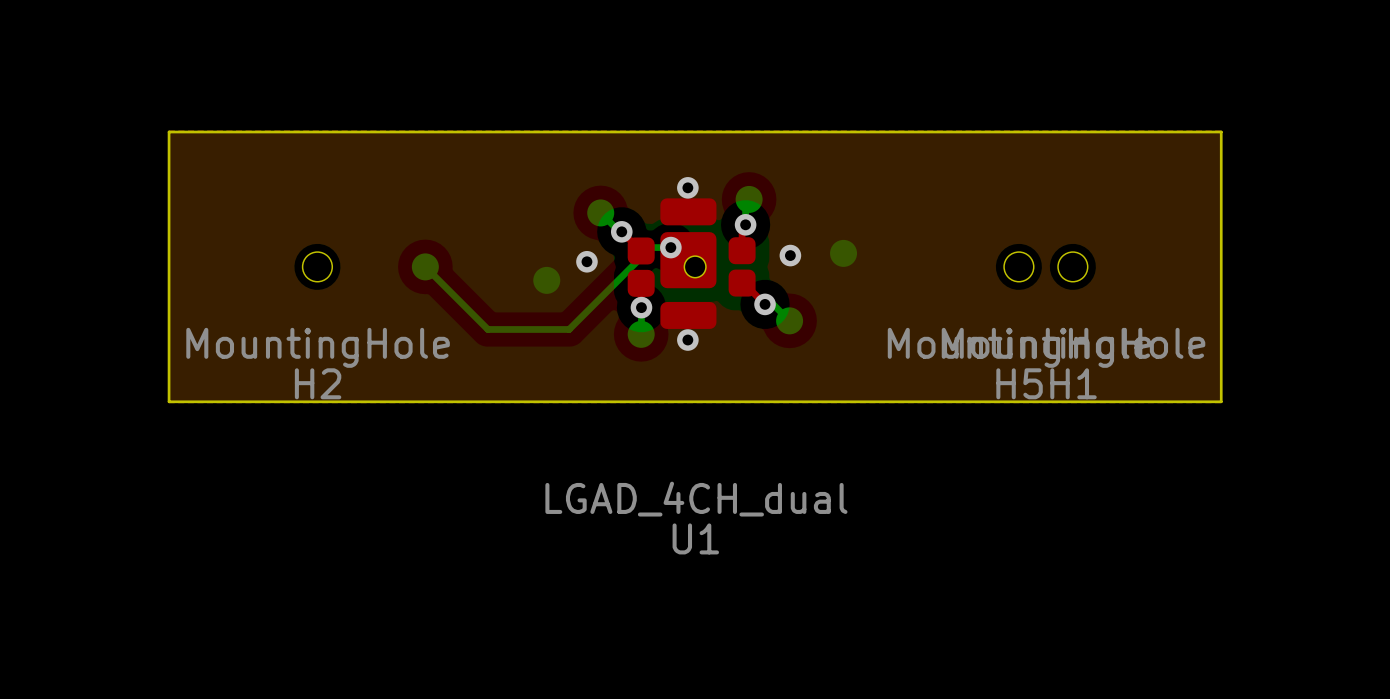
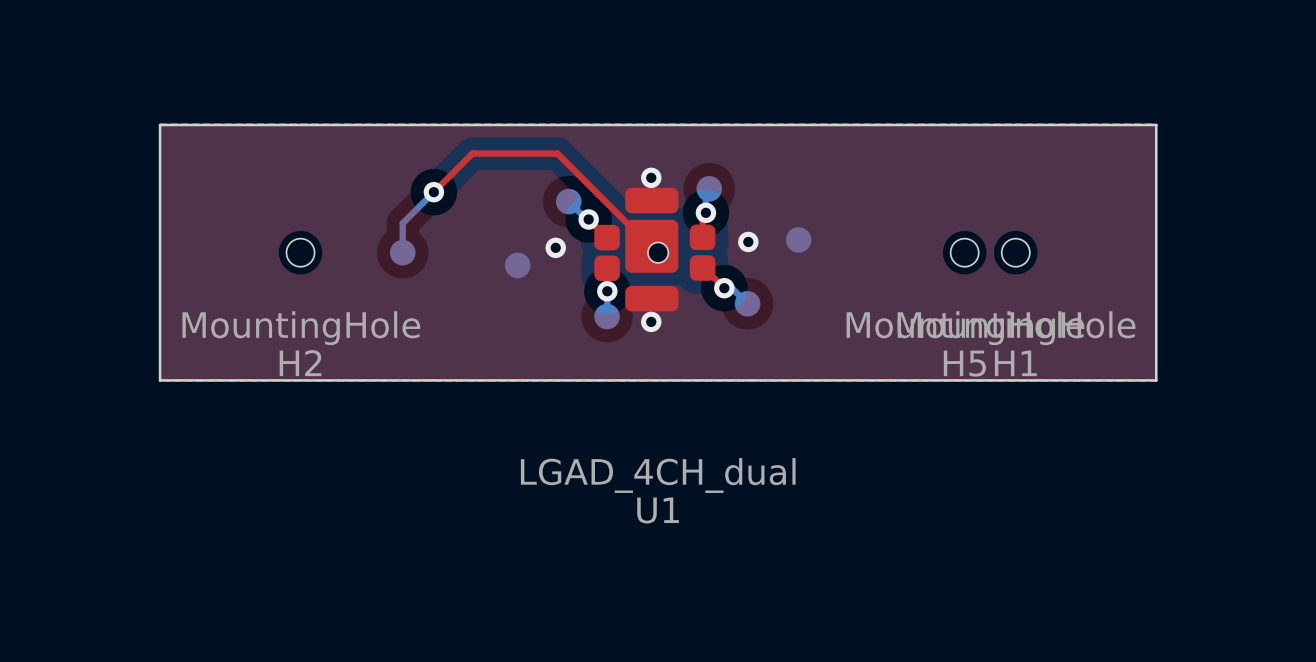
top track: none -> (433, 192) (472, 153) (557, 153) (643, 237)
via: none -> (433, 192)
bottom track: (670, 247) (651, 247) (569, 329) (487, 329) (425, 266) -> (433, 192) (402, 223) (402, 252)
via: (670, 247) -> none

